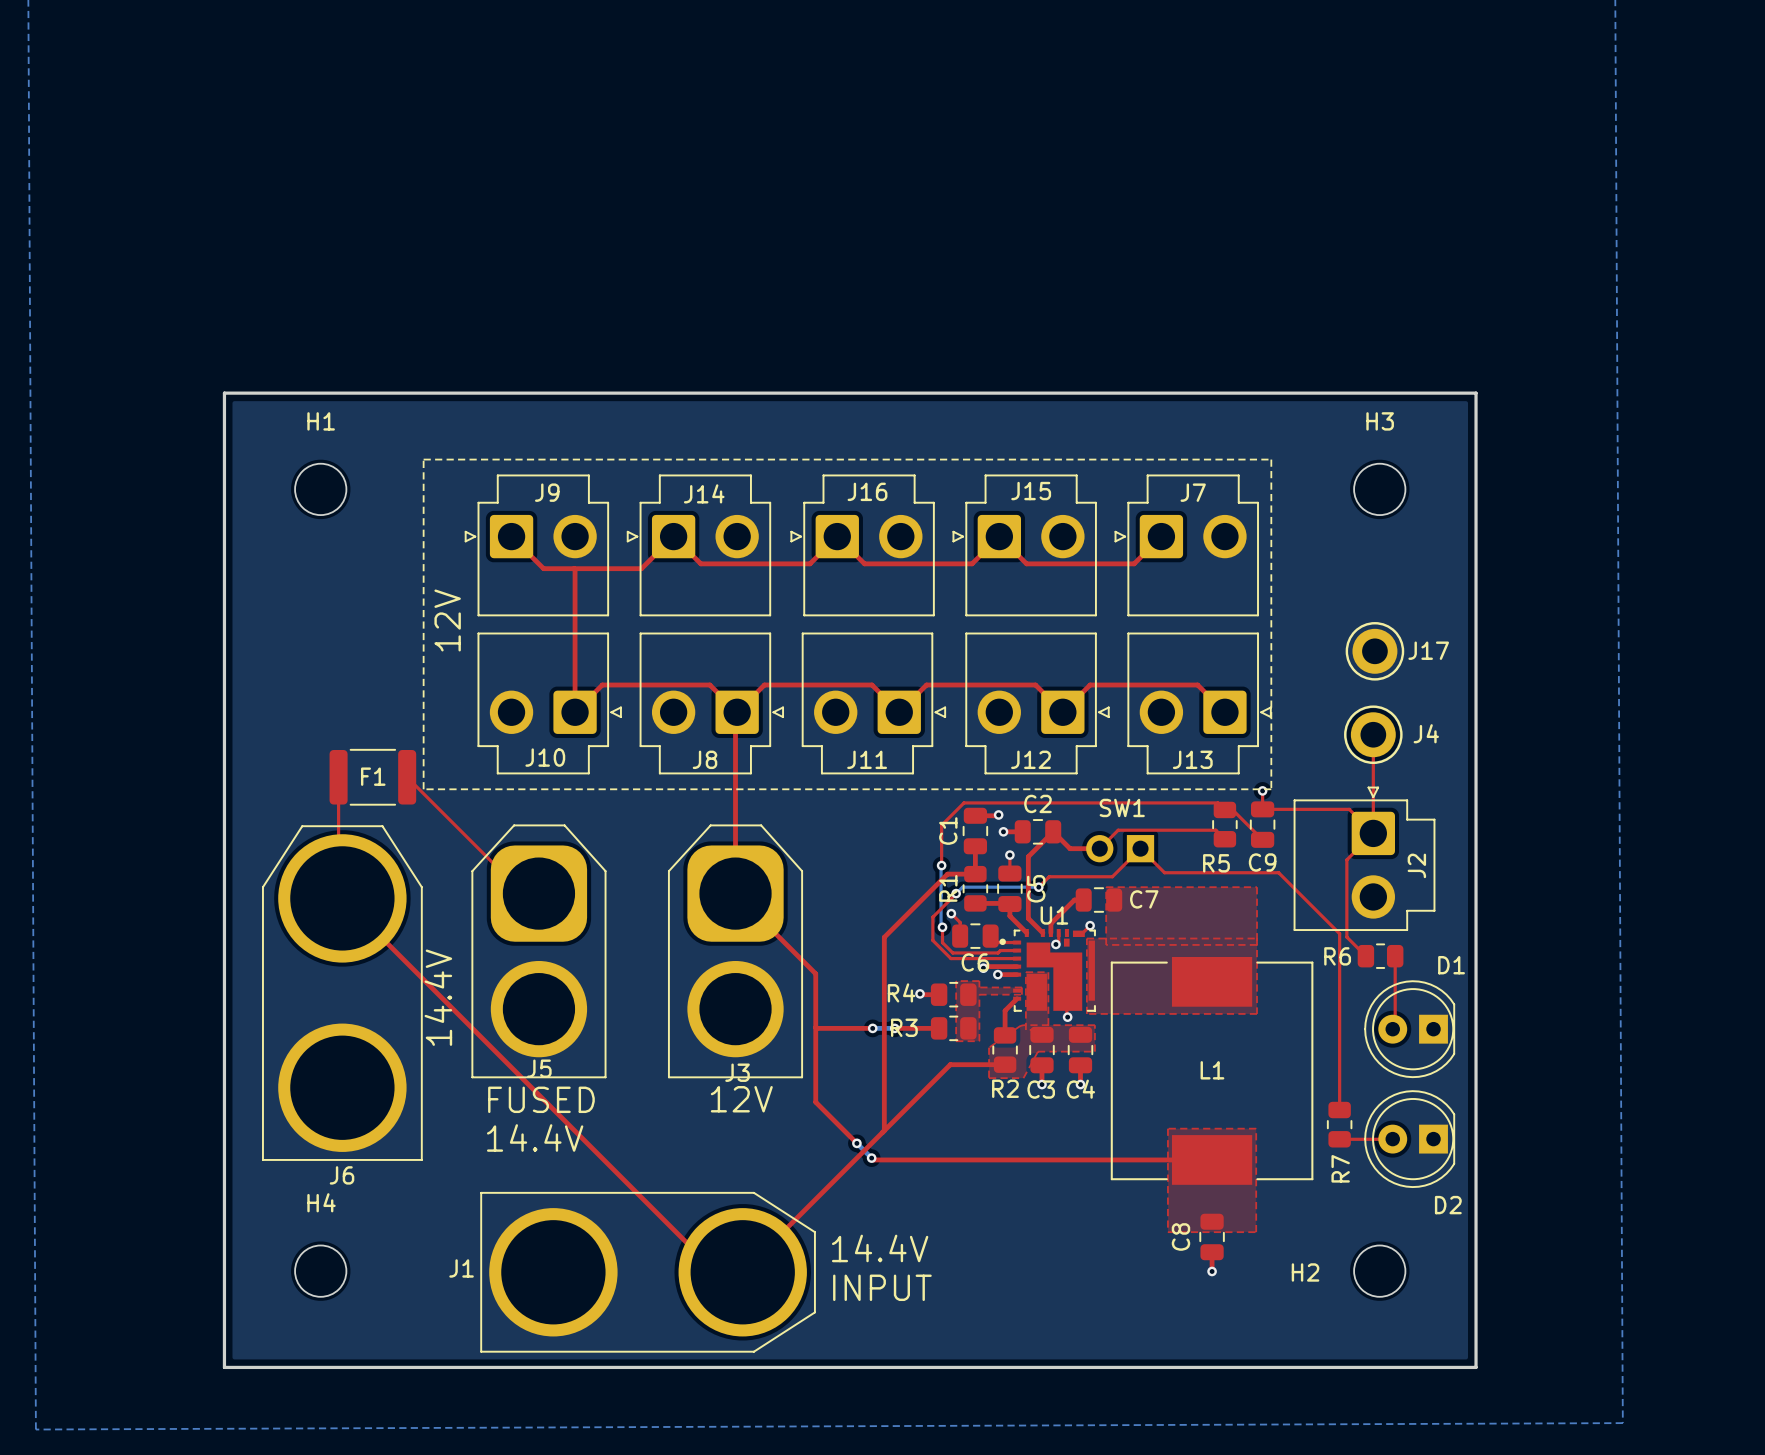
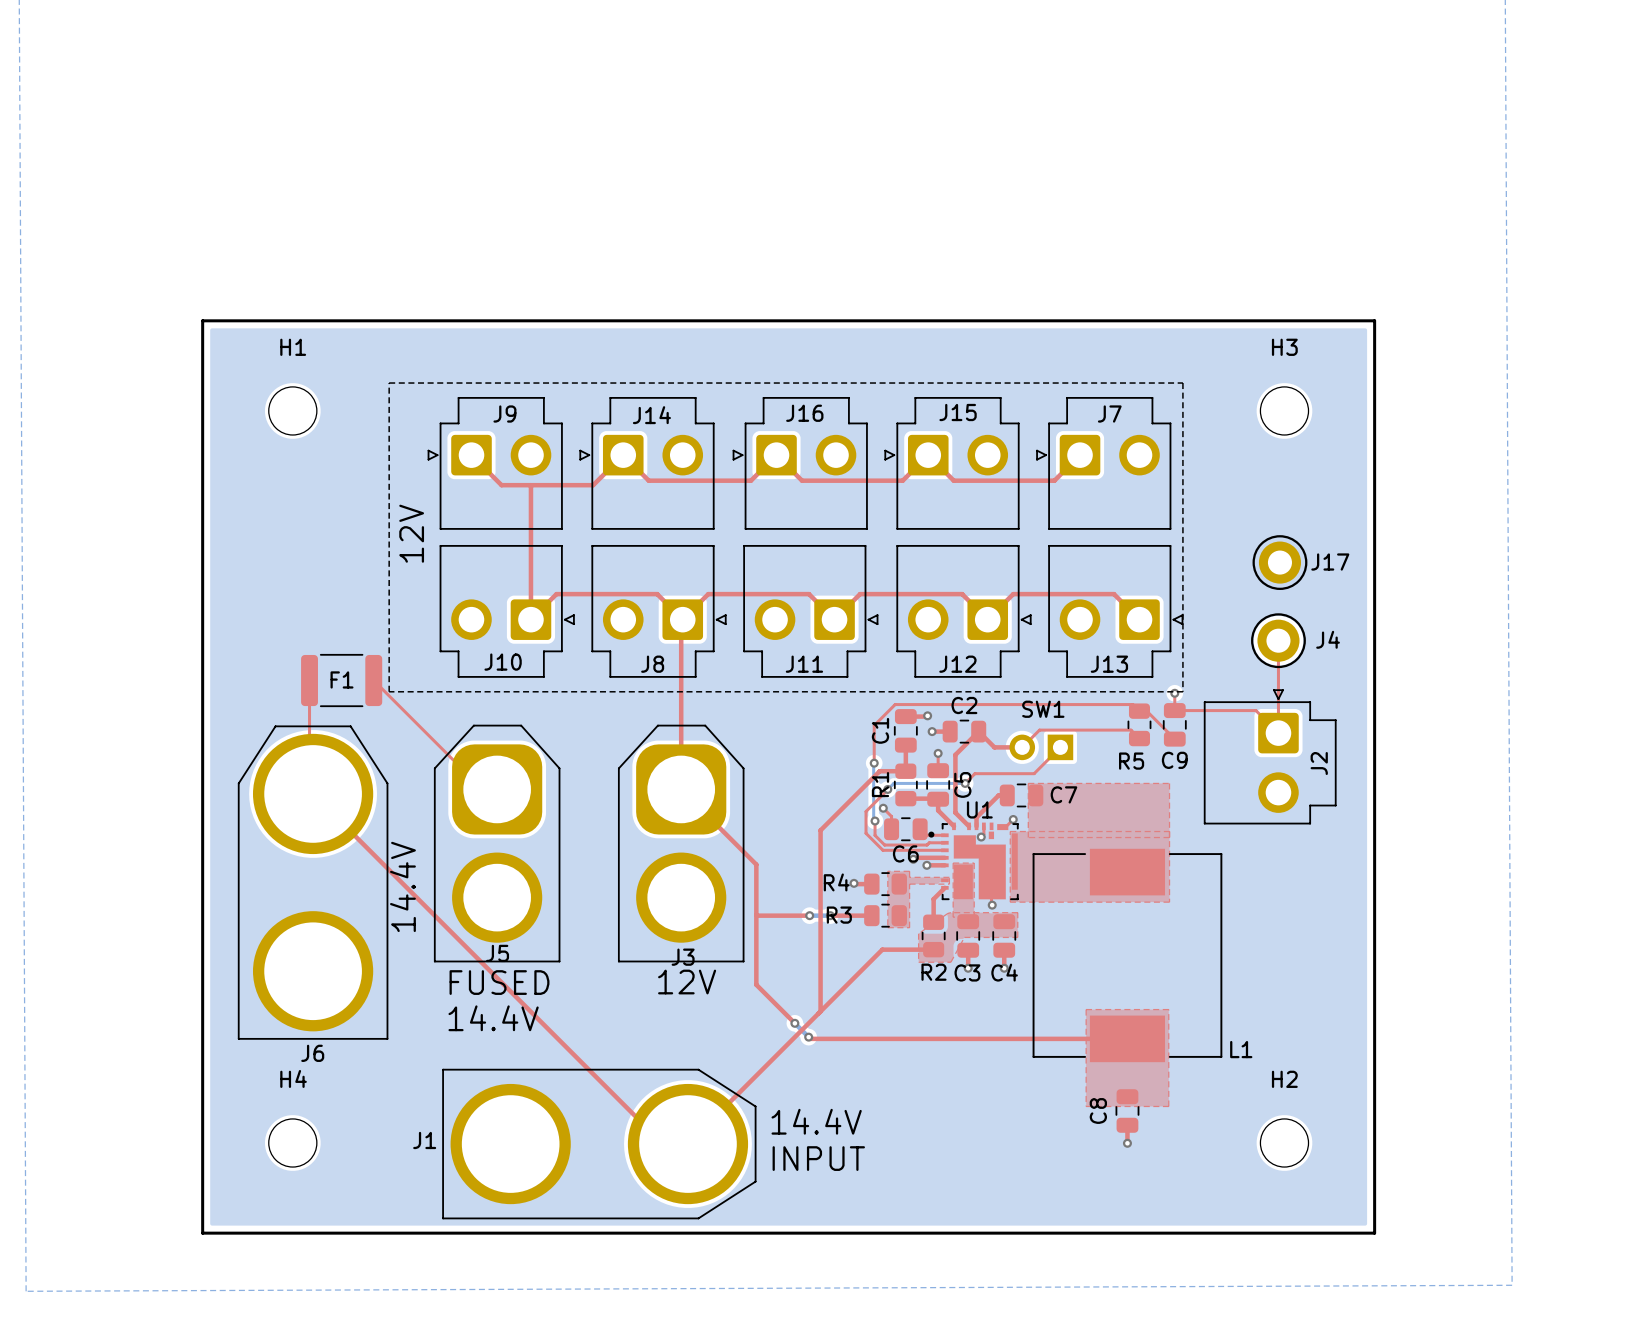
top track: (1366, 839) (1346, 859) (1346, 937) (1365, 956) -> none
top track: (1140, 848) (1164, 872) (1278, 872) (1339, 933) (1339, 1110) -> none
R6: (1380, 956) -> none
top track: (1395, 956) (1395, 1026) (1392, 1029) -> none
D1: (1409, 1029) -> none
L1 name position: L1 (1212, 1070) -> L1 (1241, 1049)
R7: (1339, 1124) -> none
top track: (1339, 1139) (1392, 1139) -> none
D2: (1409, 1139) -> none
H2 name position: H2 (1305, 1272) -> H2 (1284, 1079)

